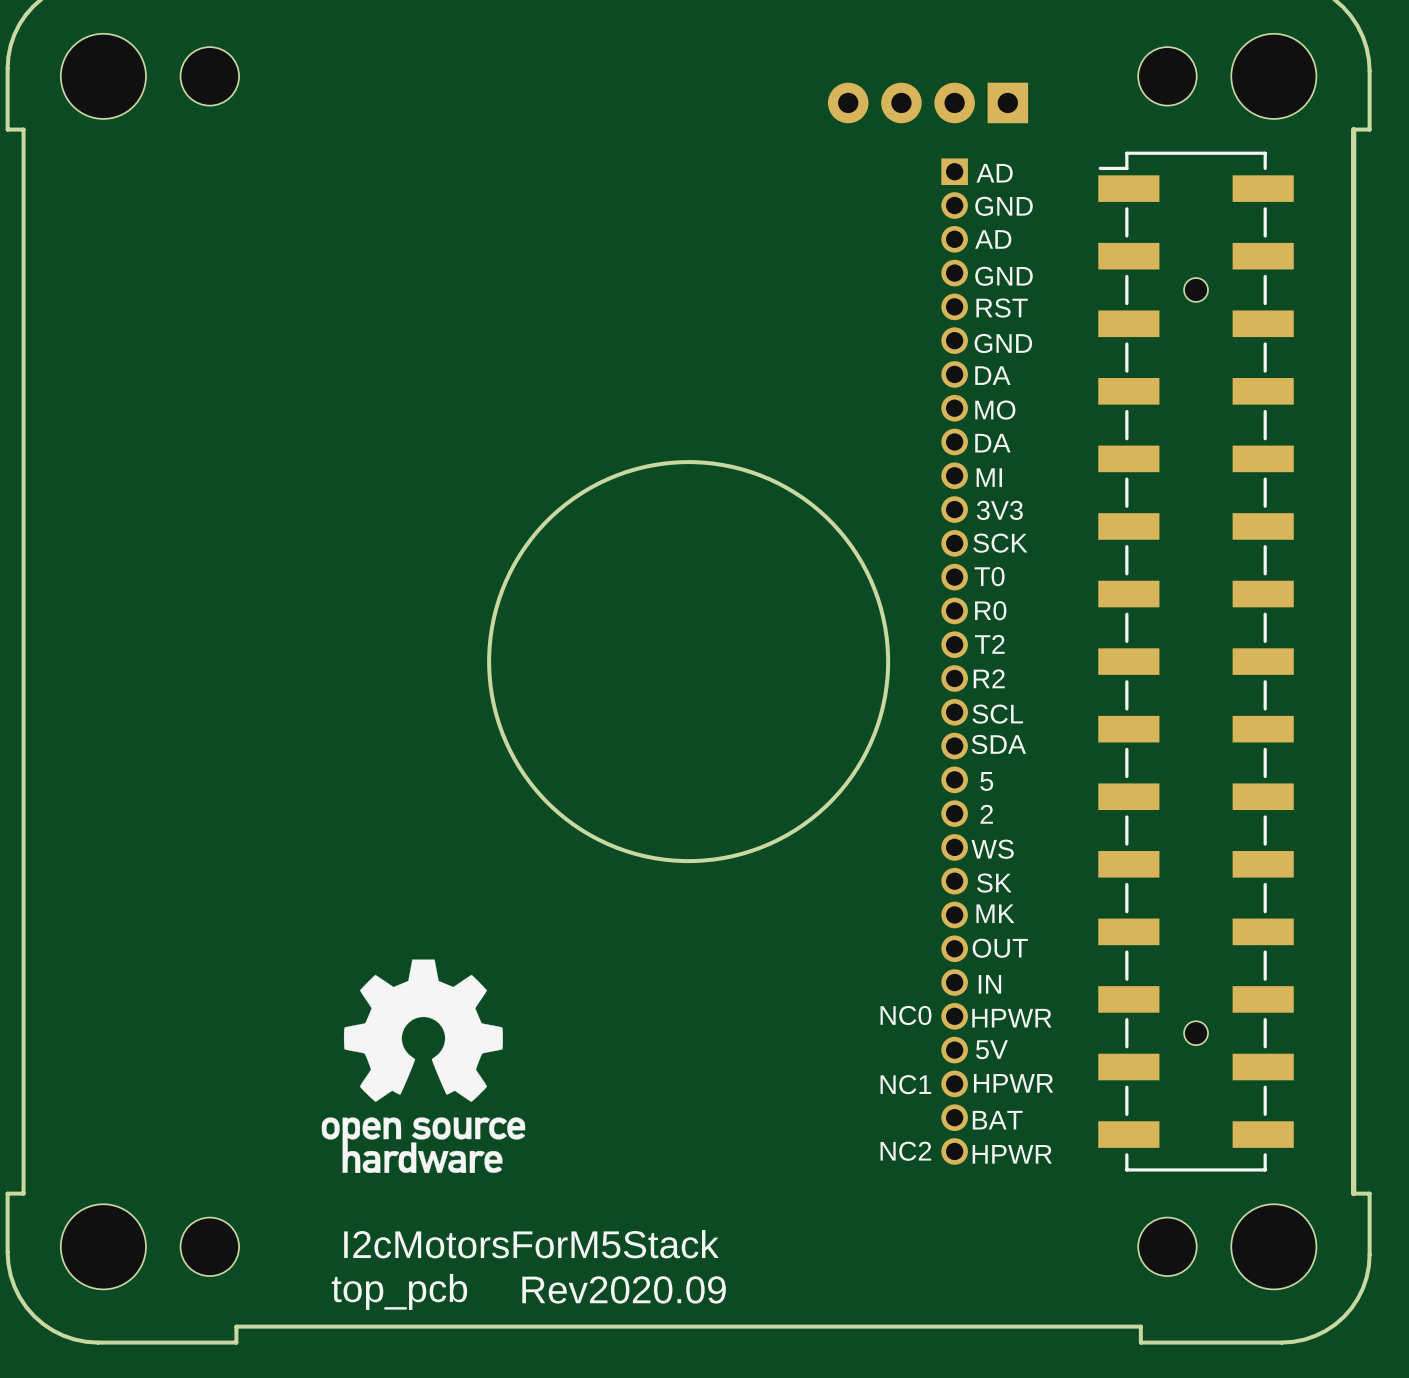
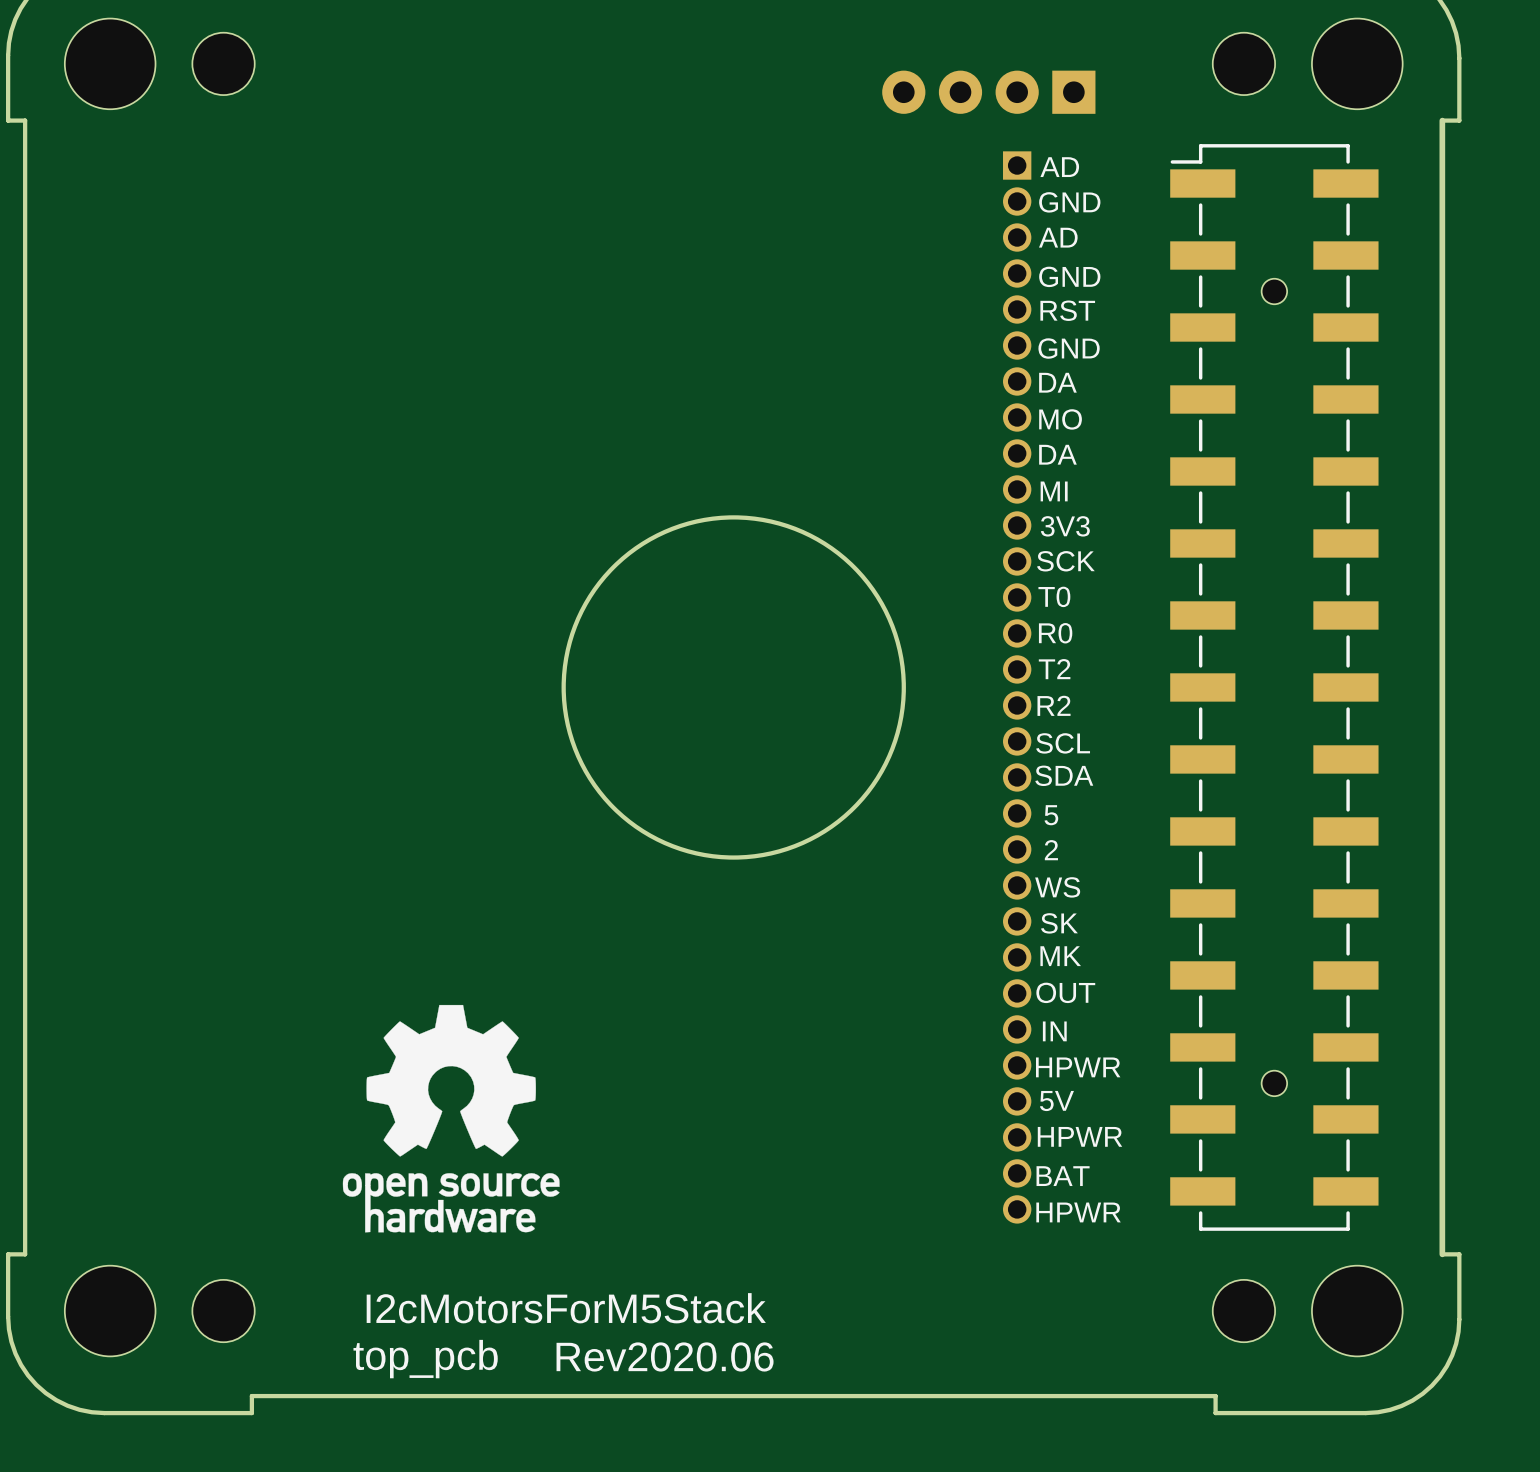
round board edge size: [487, 460, 891, 864] -> [561, 515, 906, 860]
text: NC0 (905, 1015) -> none
text: NC1 (905, 1084) -> none
text: NC2 (905, 1151) -> none
text: Rev2020.09 (624, 1289) -> Rev2020.06 (665, 1356)

